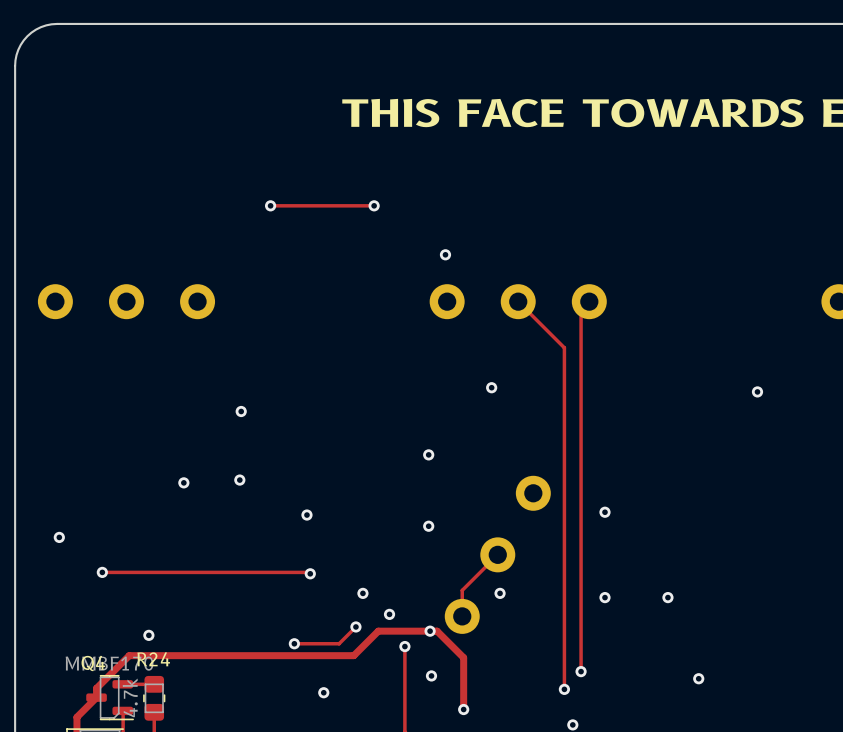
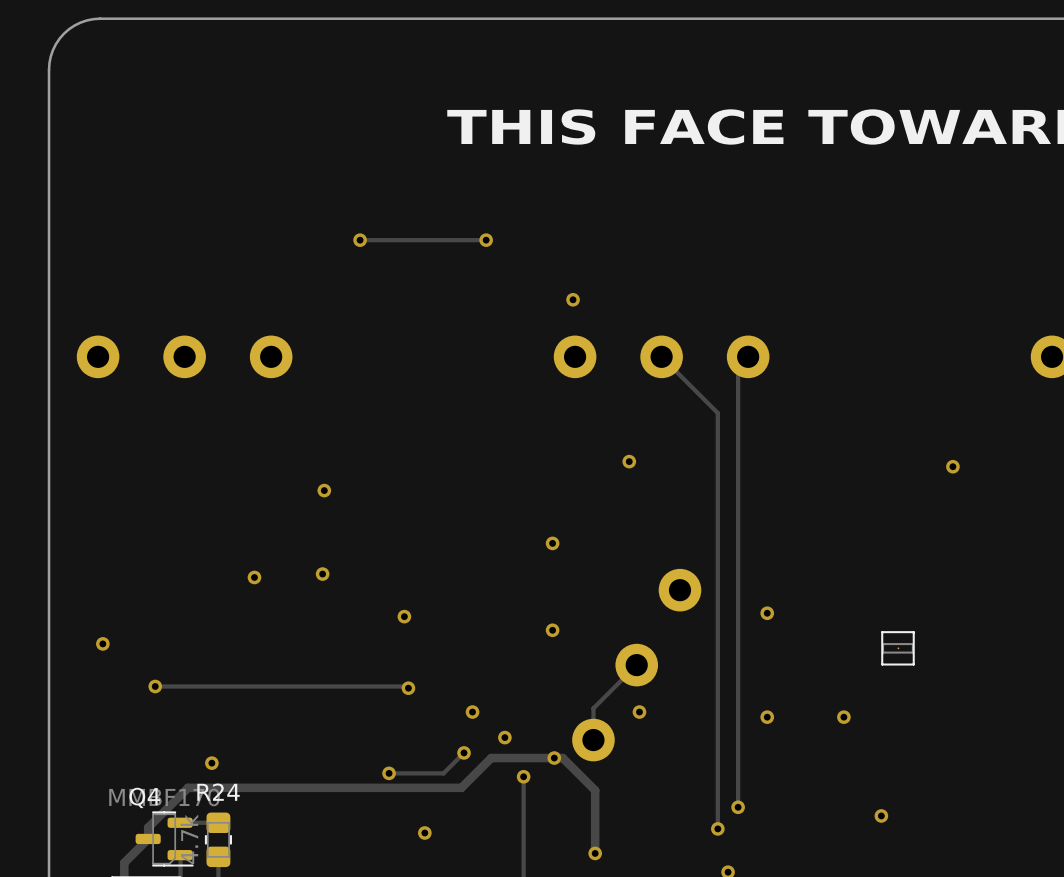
part: none -> (897, 648)
via: (431, 675) -> none

